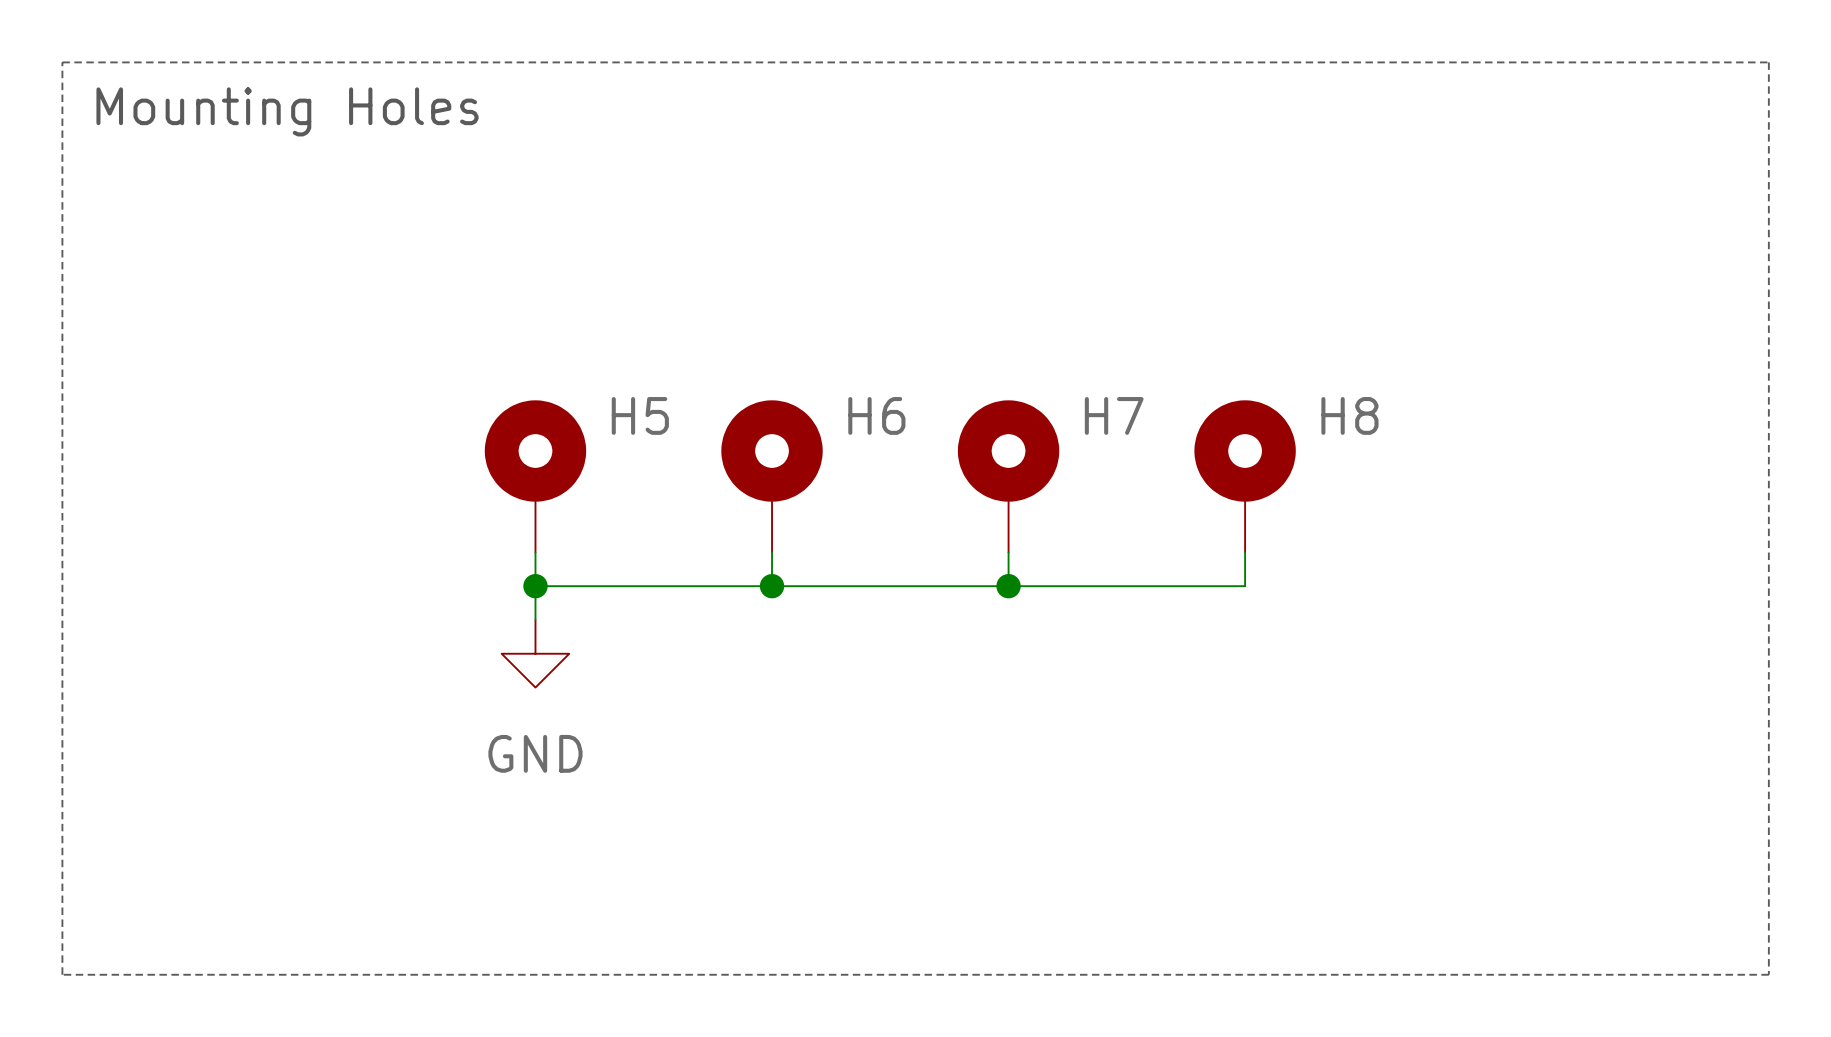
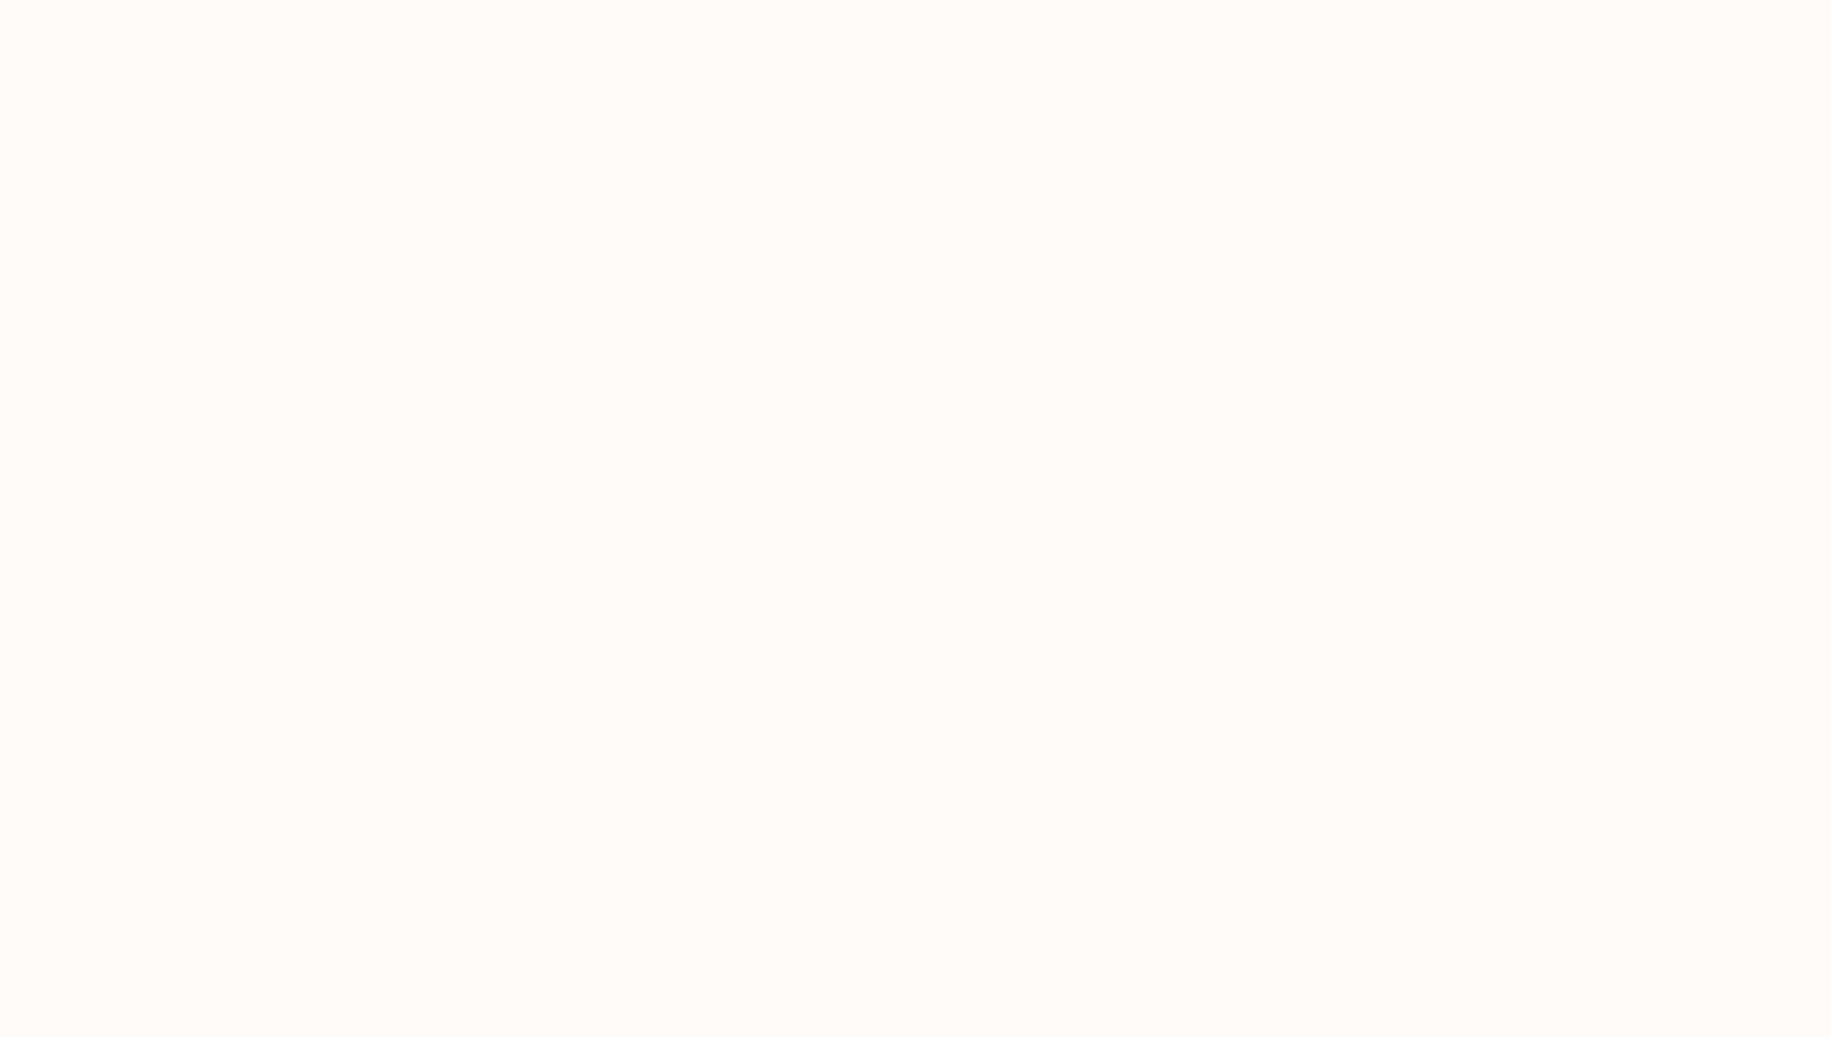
line: (62, 62) (1768, 62) (1768, 974) (62, 974) (62, 62) -> none
text: Mounting Holes (287, 111) -> none
H5: (535, 476) -> none
H6: (772, 476) -> none
H7: (1008, 476) -> none
H8: (1245, 476) -> none
wire: (535, 552) (535, 619) -> none
wire: (772, 552) (772, 586) -> none
wire: (1008, 552) (1008, 586) -> none
wire: (1245, 552) (1245, 586) (535, 586) -> none
junction: (535, 586) -> none
junction: (772, 586) -> none
junction: (1008, 586) -> none
power symbol: GND (535, 653) -> none

